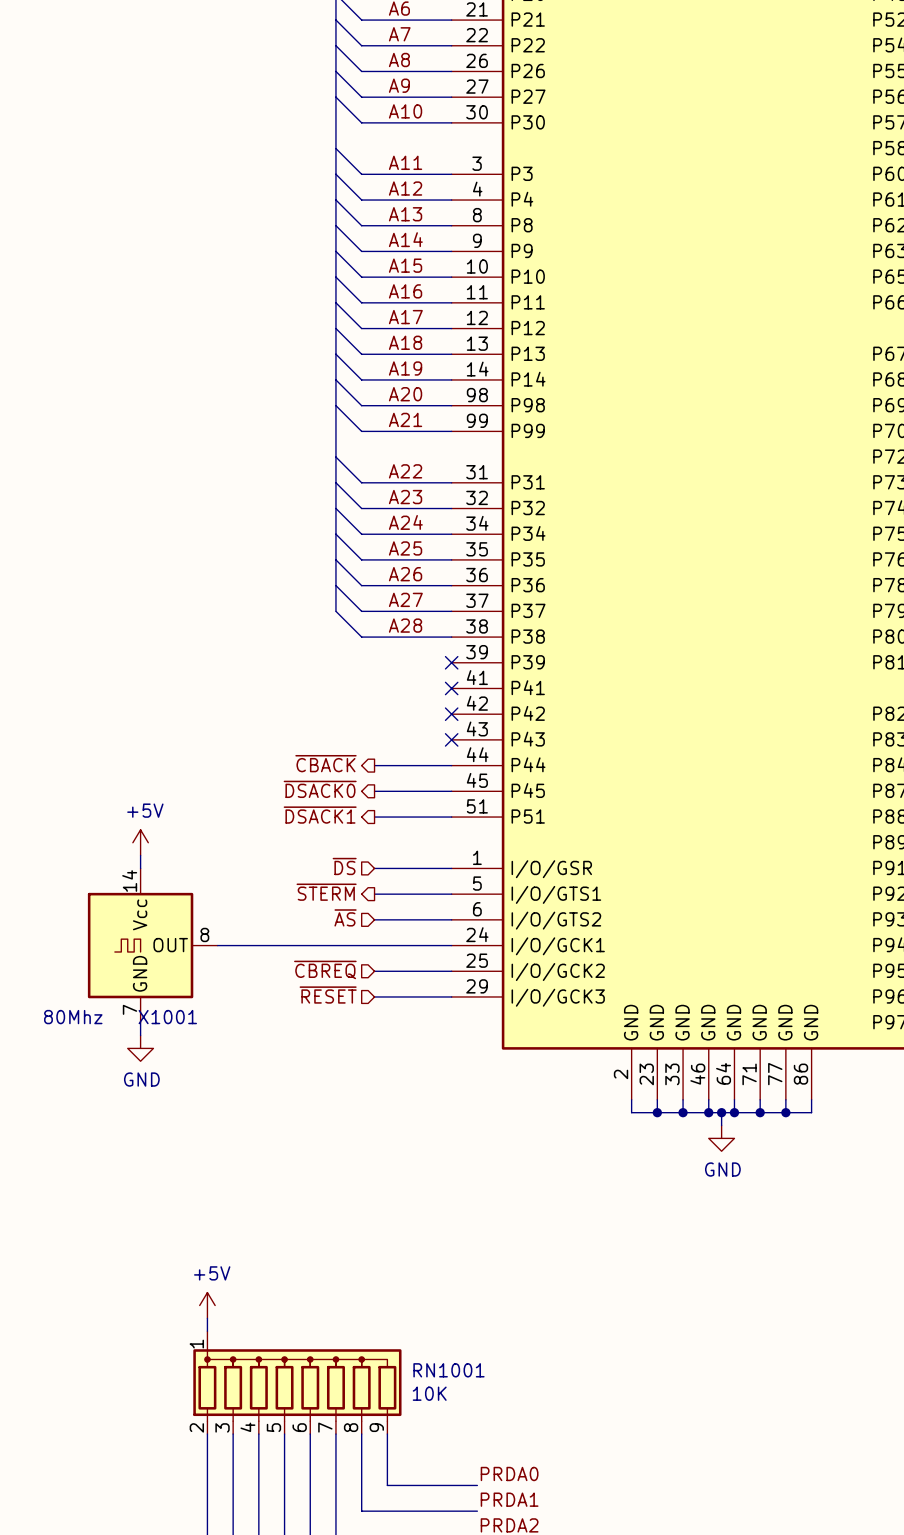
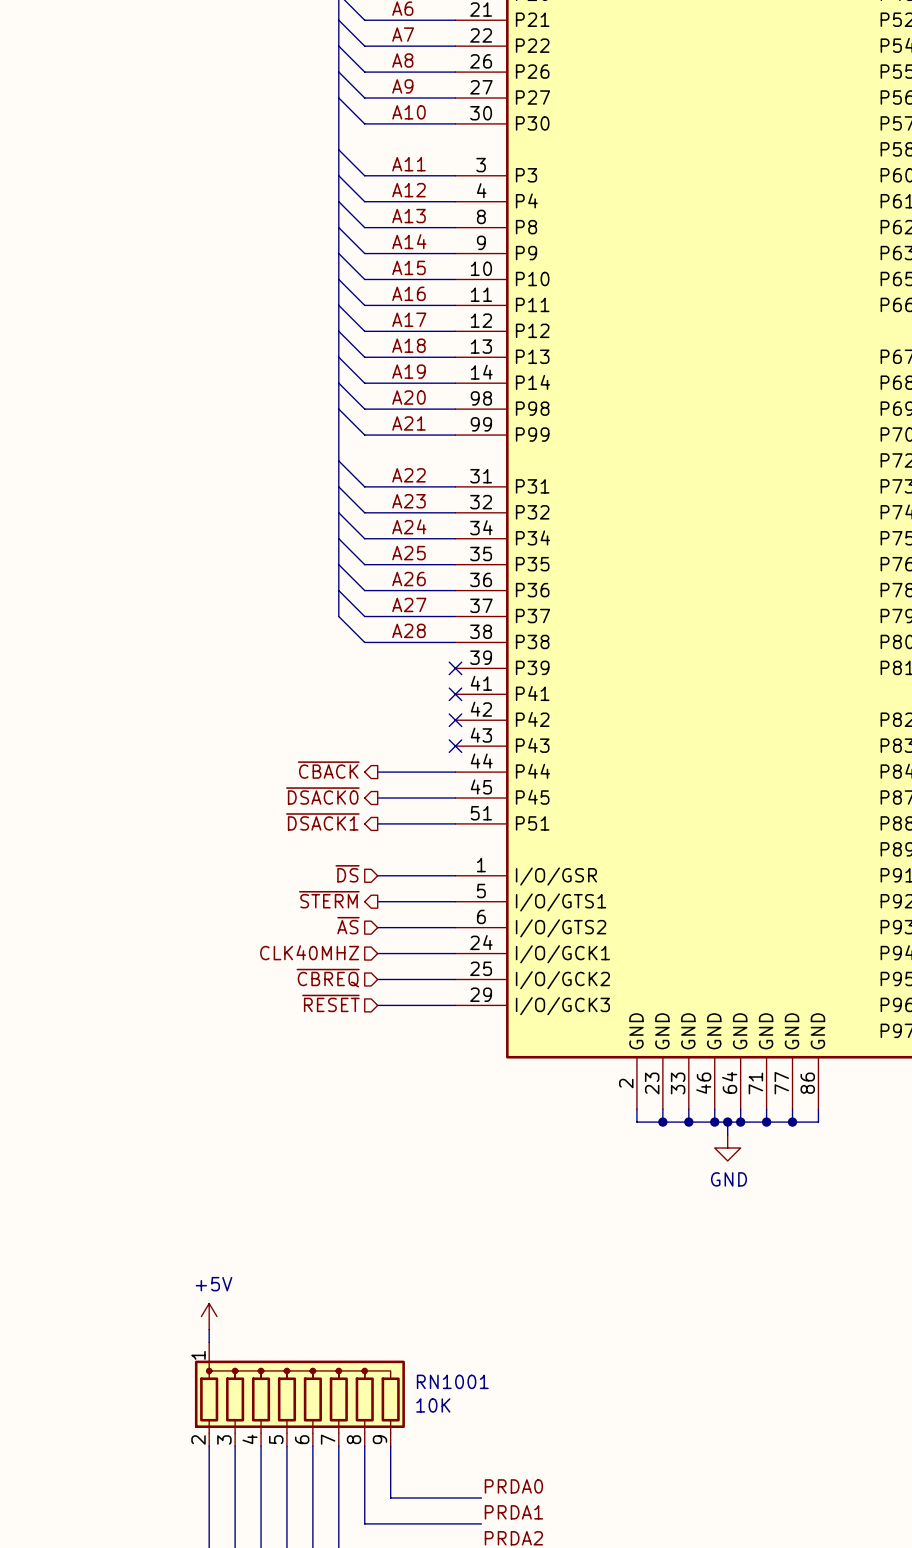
power symbol: +5V (140, 842) -> none
wire: (140, 855) (140, 868) -> none
hierarchical label: none -> CLK40MHZ (309, 952)
X1001: 80Mhz (152, 945) -> none
wire: (217, 945) (374, 945) -> none
wire: (140, 1022) (140, 1035) -> none
power symbol: GND (140, 1048) -> none

